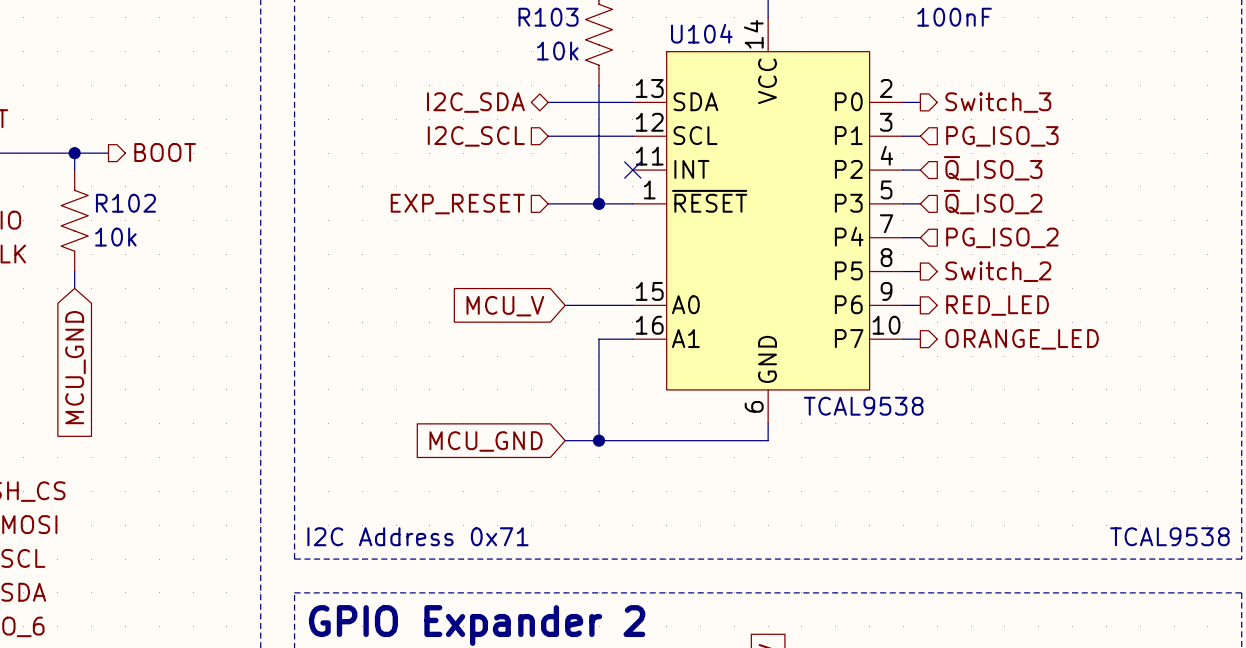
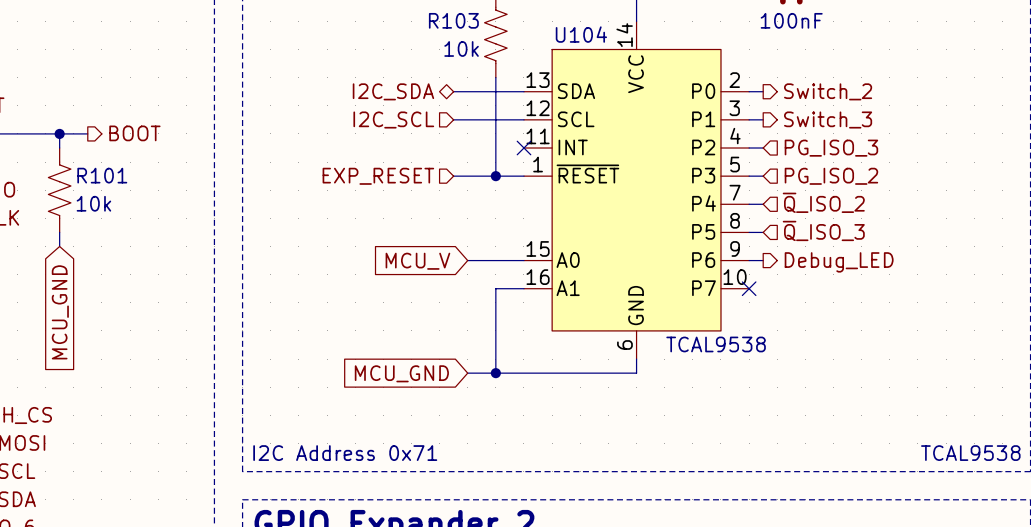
hierarchical label: Switch_3 (998, 102) -> Switch_2 (828, 91)
hierarchical label shape: input (1002, 136) -> output (828, 120)
hierarchical label: PG_ISO_3 (1002, 136) -> Switch_3 (828, 120)
hierarchical label: ~{Q}_ISO_3 (993, 168) -> PG_ISO_3 (831, 148)
hierarchical label: ~{Q}_ISO_2 (993, 202) -> PG_ISO_2 (831, 176)
R102 name: R102 (125, 203) -> R101 (102, 175)
hierarchical label: PG_ISO_2 (1002, 237) -> ~{Q}_ISO_2 (823, 202)
hierarchical label shape: output (998, 271) -> input (823, 230)
hierarchical label: Switch_2 (998, 271) -> ~{Q}_ISO_3 (823, 230)
hierarchical label: RED_LED (997, 305) -> Debug_LED (839, 262)
wire: (903, 339) (920, 339) -> none
no-connect mark: none -> (749, 288)
hierarchical label: ORANGE_LED (1022, 339) -> none

